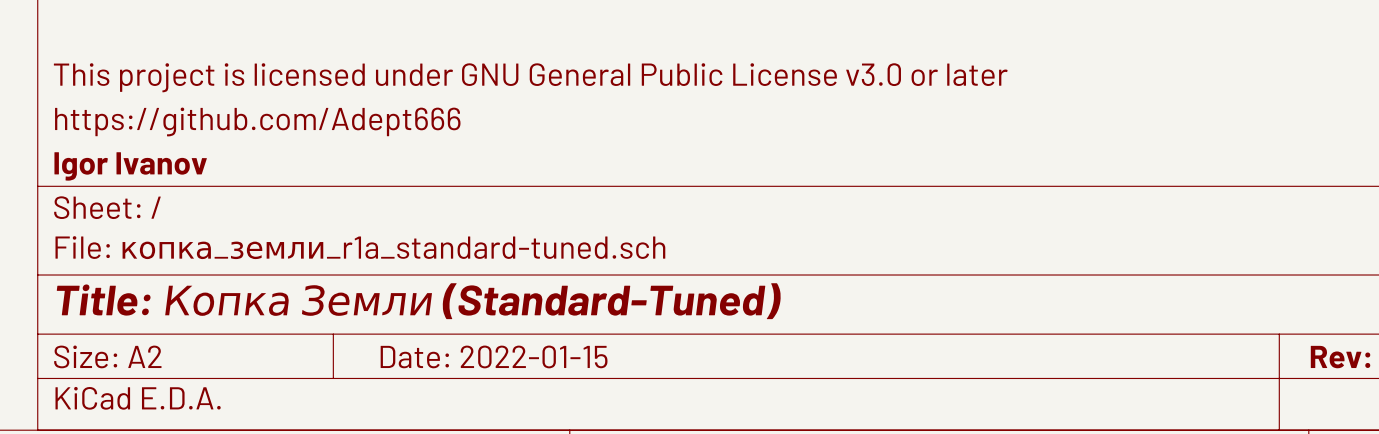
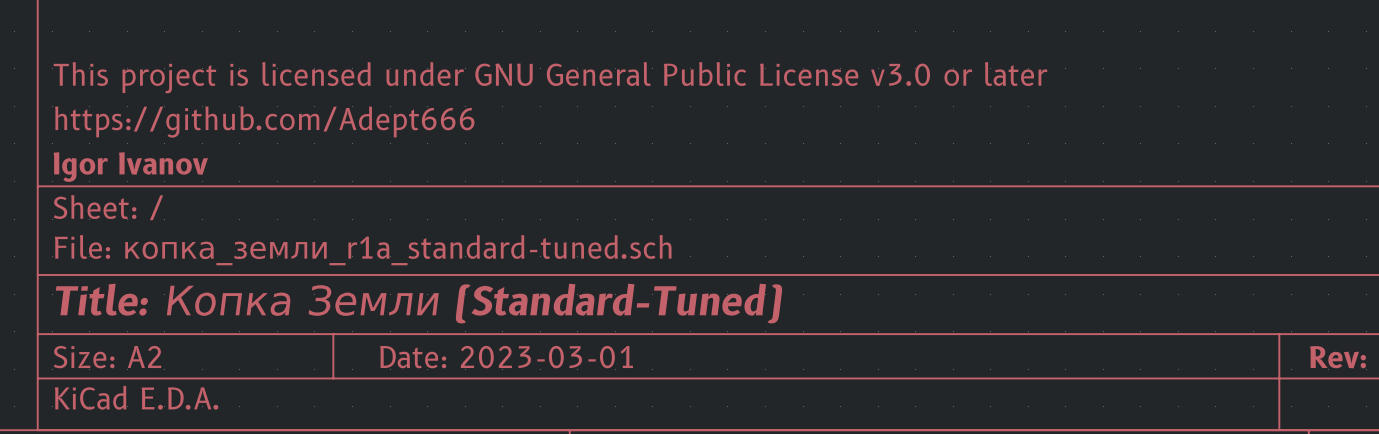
title block: Date: 2022-01-15 (494, 356) -> Date: 2023-03-01 (506, 357)

